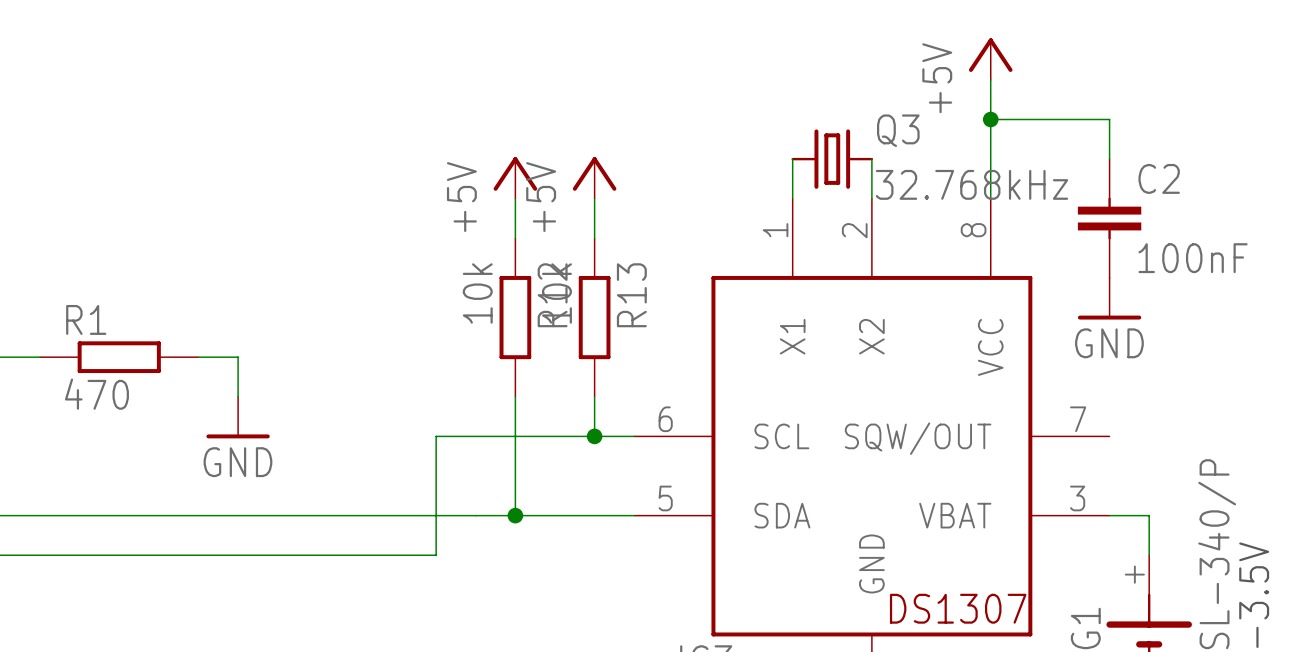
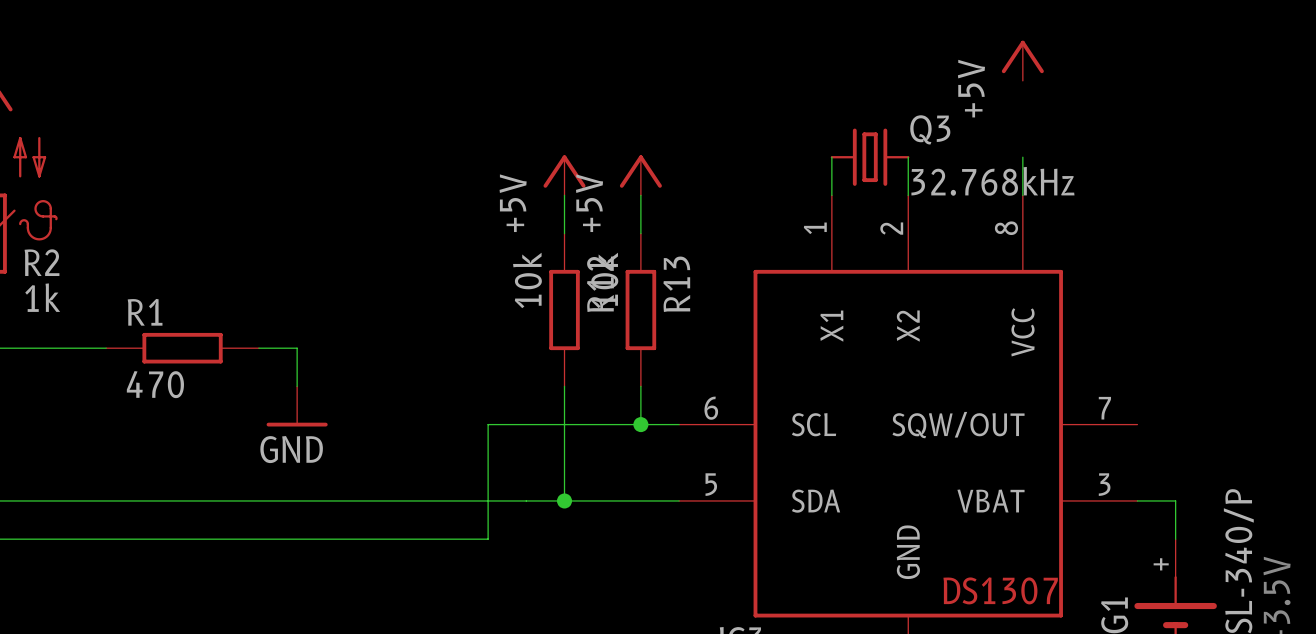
wire: (990, 79) (990, 159) -> none
wire: (990, 119) (1109, 119) (1109, 159) -> none
junction: (990, 119) -> none
C2: 100nF (1109, 218) -> none
power symbol: GND (1109, 298) -> none

